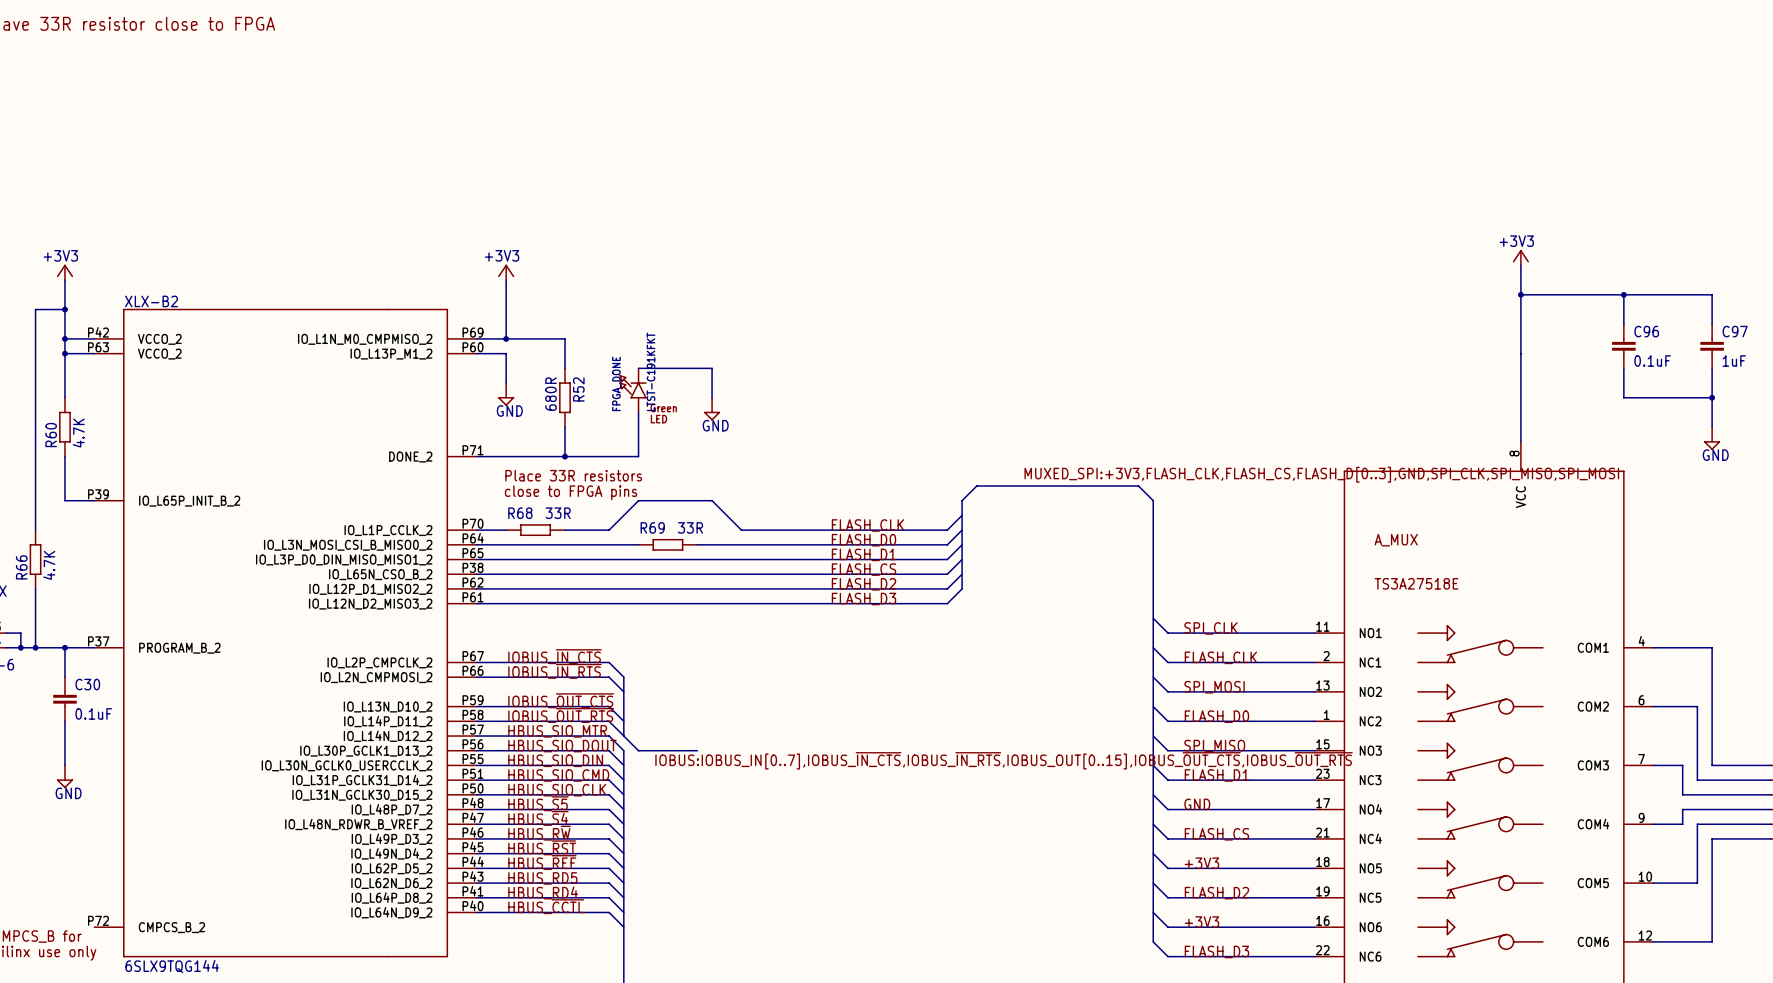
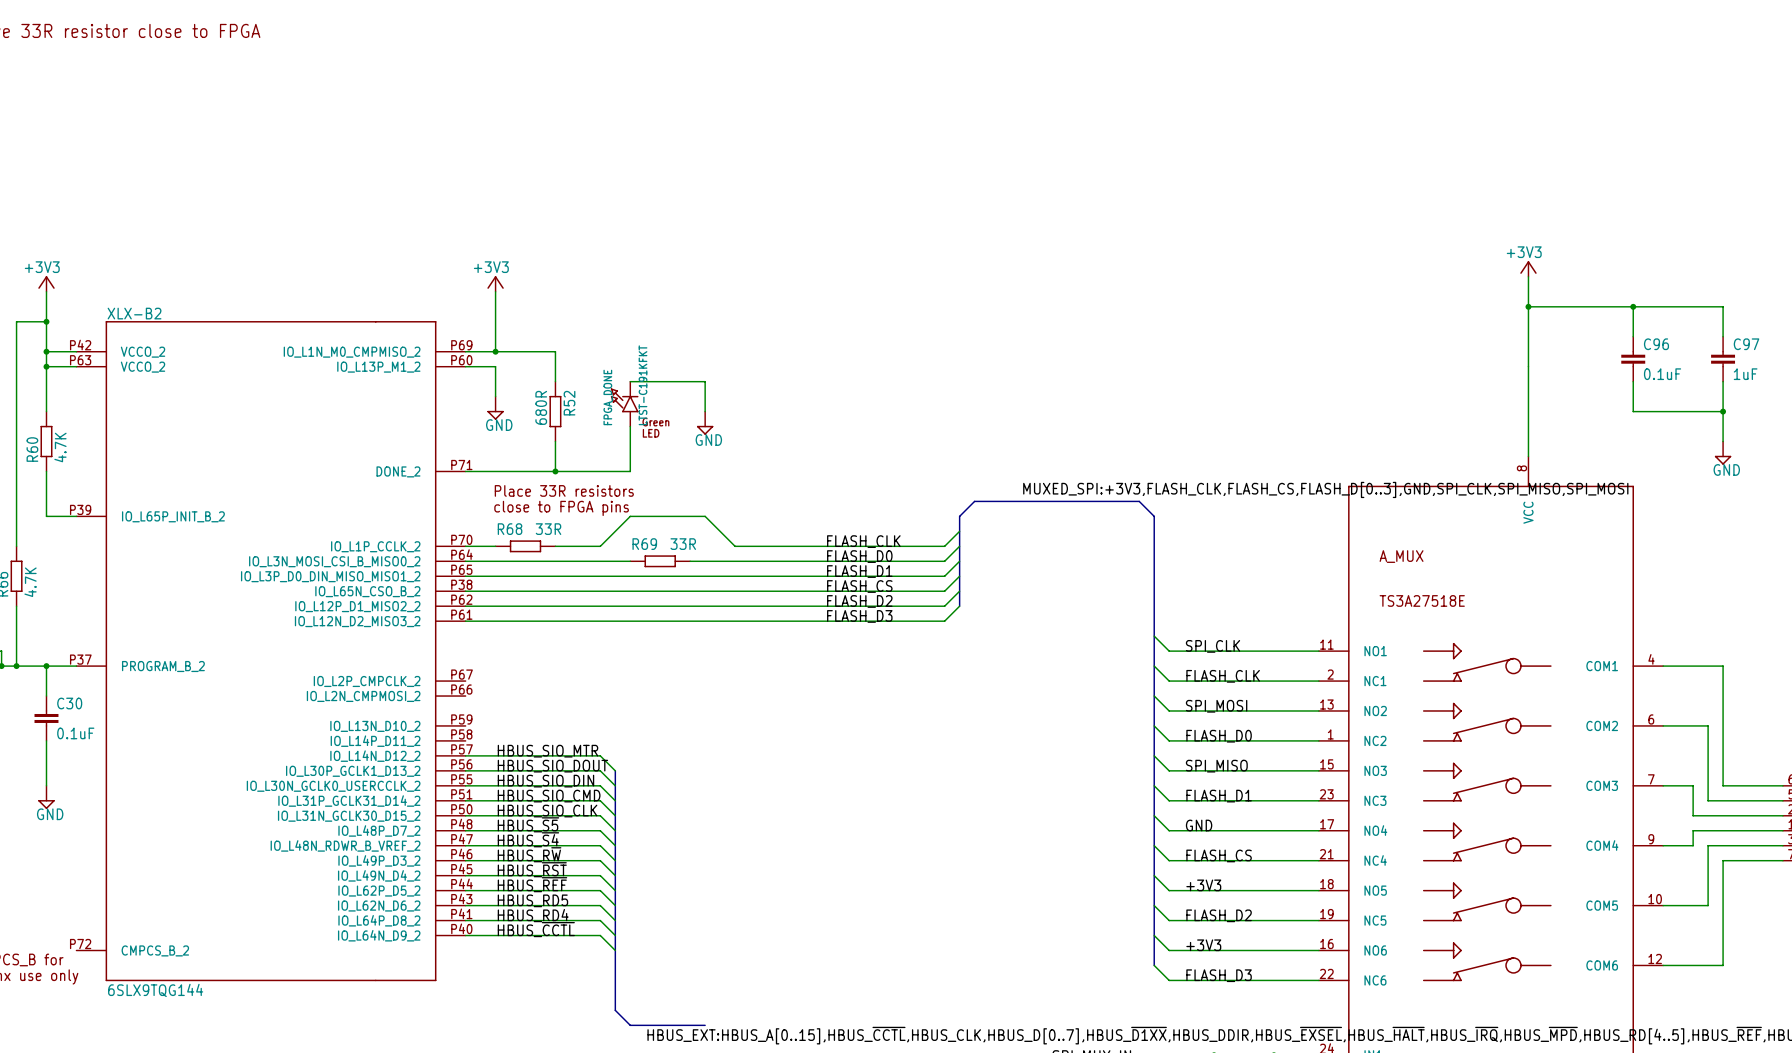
label: IOBUS_~{IN_CTS} (554, 656) -> none
wire: (476, 662) (609, 662) (623, 677) -> none
label: IOBUS_~{IN_RTS} (554, 671) -> none
wire: (476, 677) (609, 677) (623, 691) -> none
bus: (623, 677) (623, 736) (638, 750) (697, 750) -> none
label: IOBUS_~{OUT_CTS} (561, 700) -> none
wire: (476, 706) (609, 706) (623, 721) -> none
label: IOBUS_~{OUT_RTS} (561, 715) -> none
wire: (476, 721) (609, 721) (623, 736) -> none
label: IOBUS:IOBUS_IN[0..7],IOBUS_~{IN_CTS},IOBUS_~{IN_RTS},IOBUS_OUT[0..15],IOBUS_~{OUT_CTS},IOBUS_~{OUT_RTS} (1004, 760) -> none

